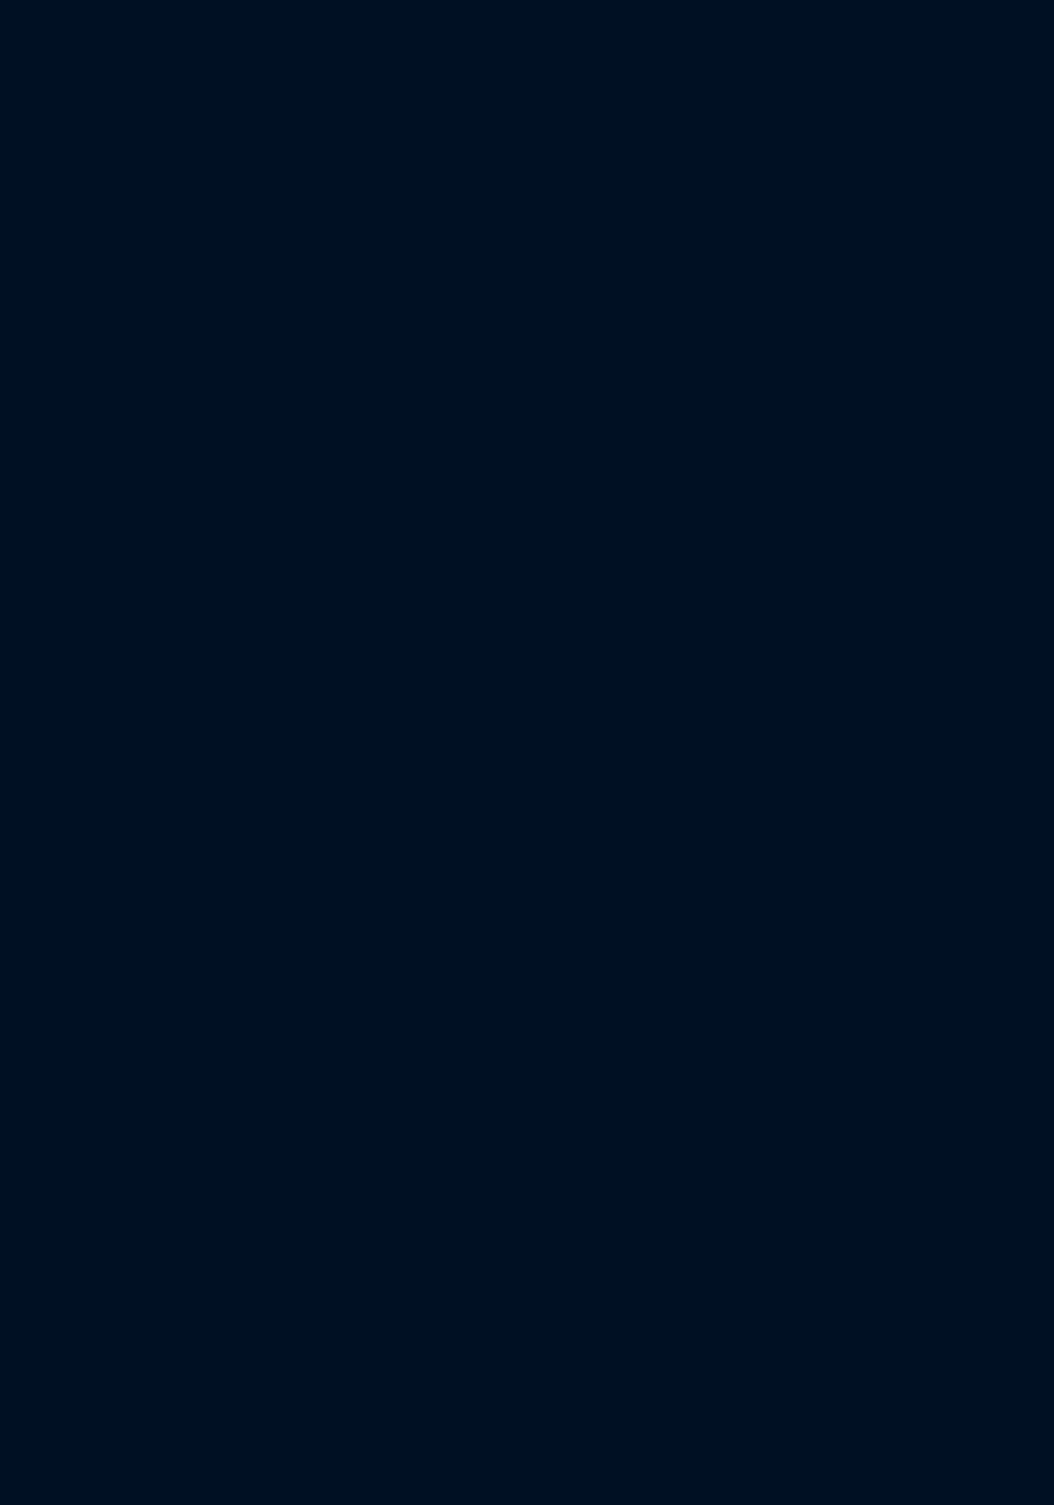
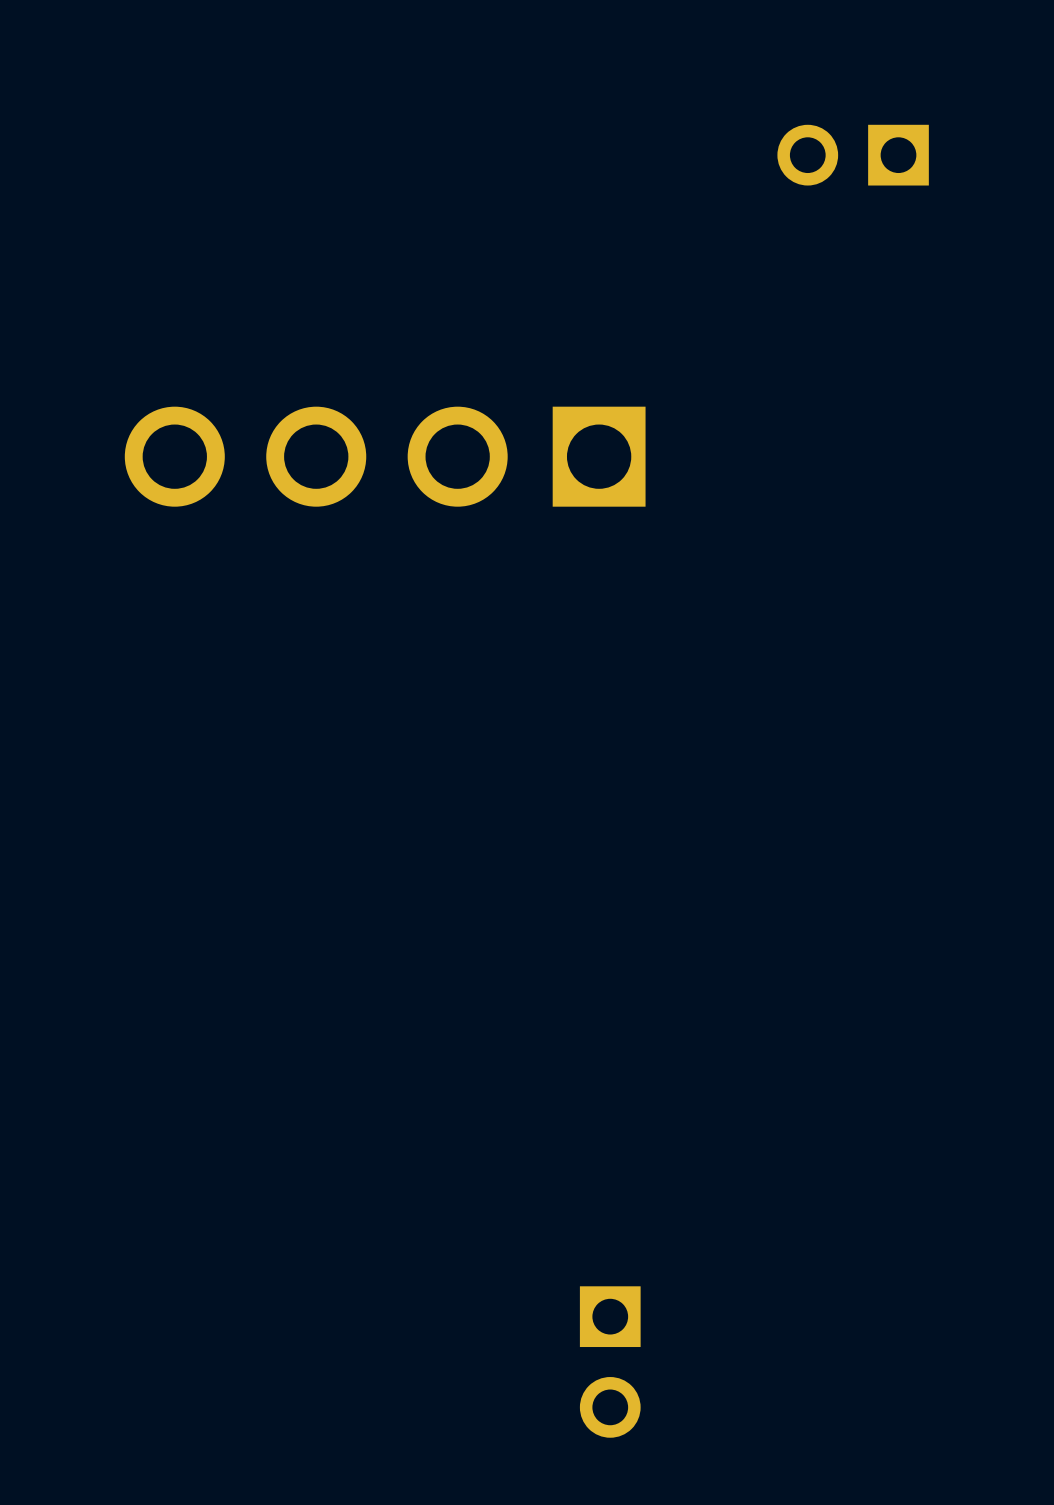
part: none -> (853, 155)
part: none -> (385, 456)
part: none -> (610, 1362)

